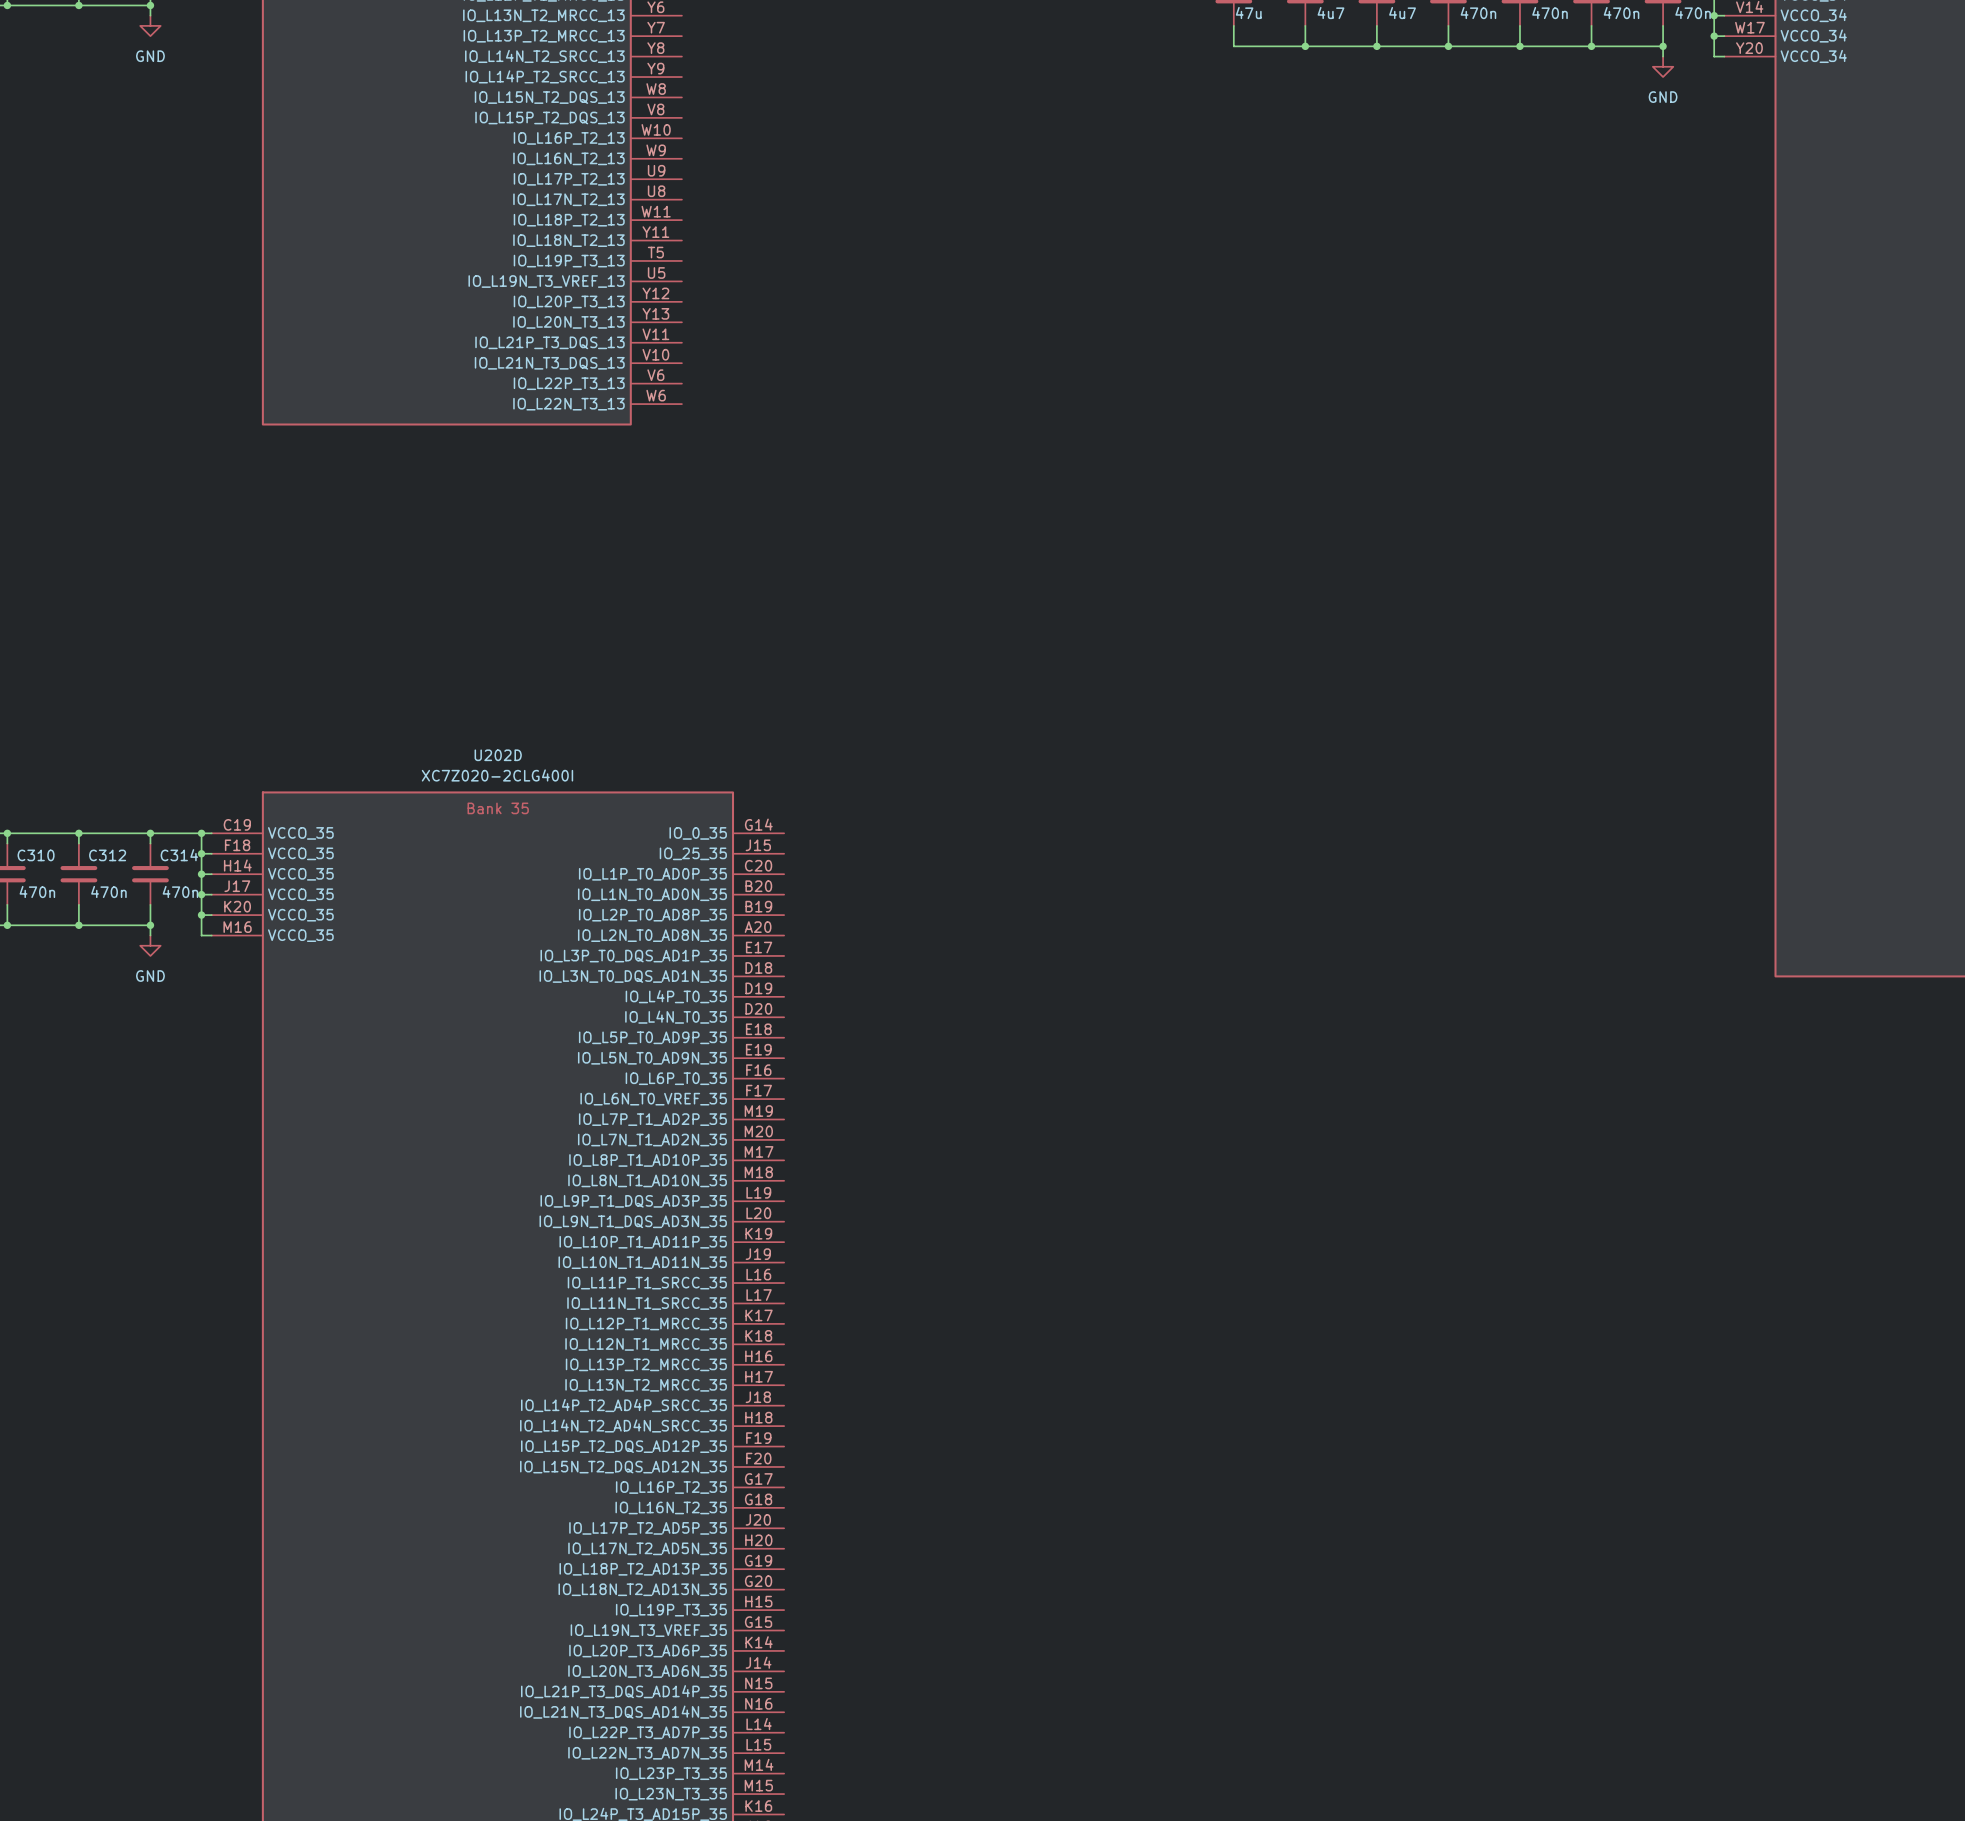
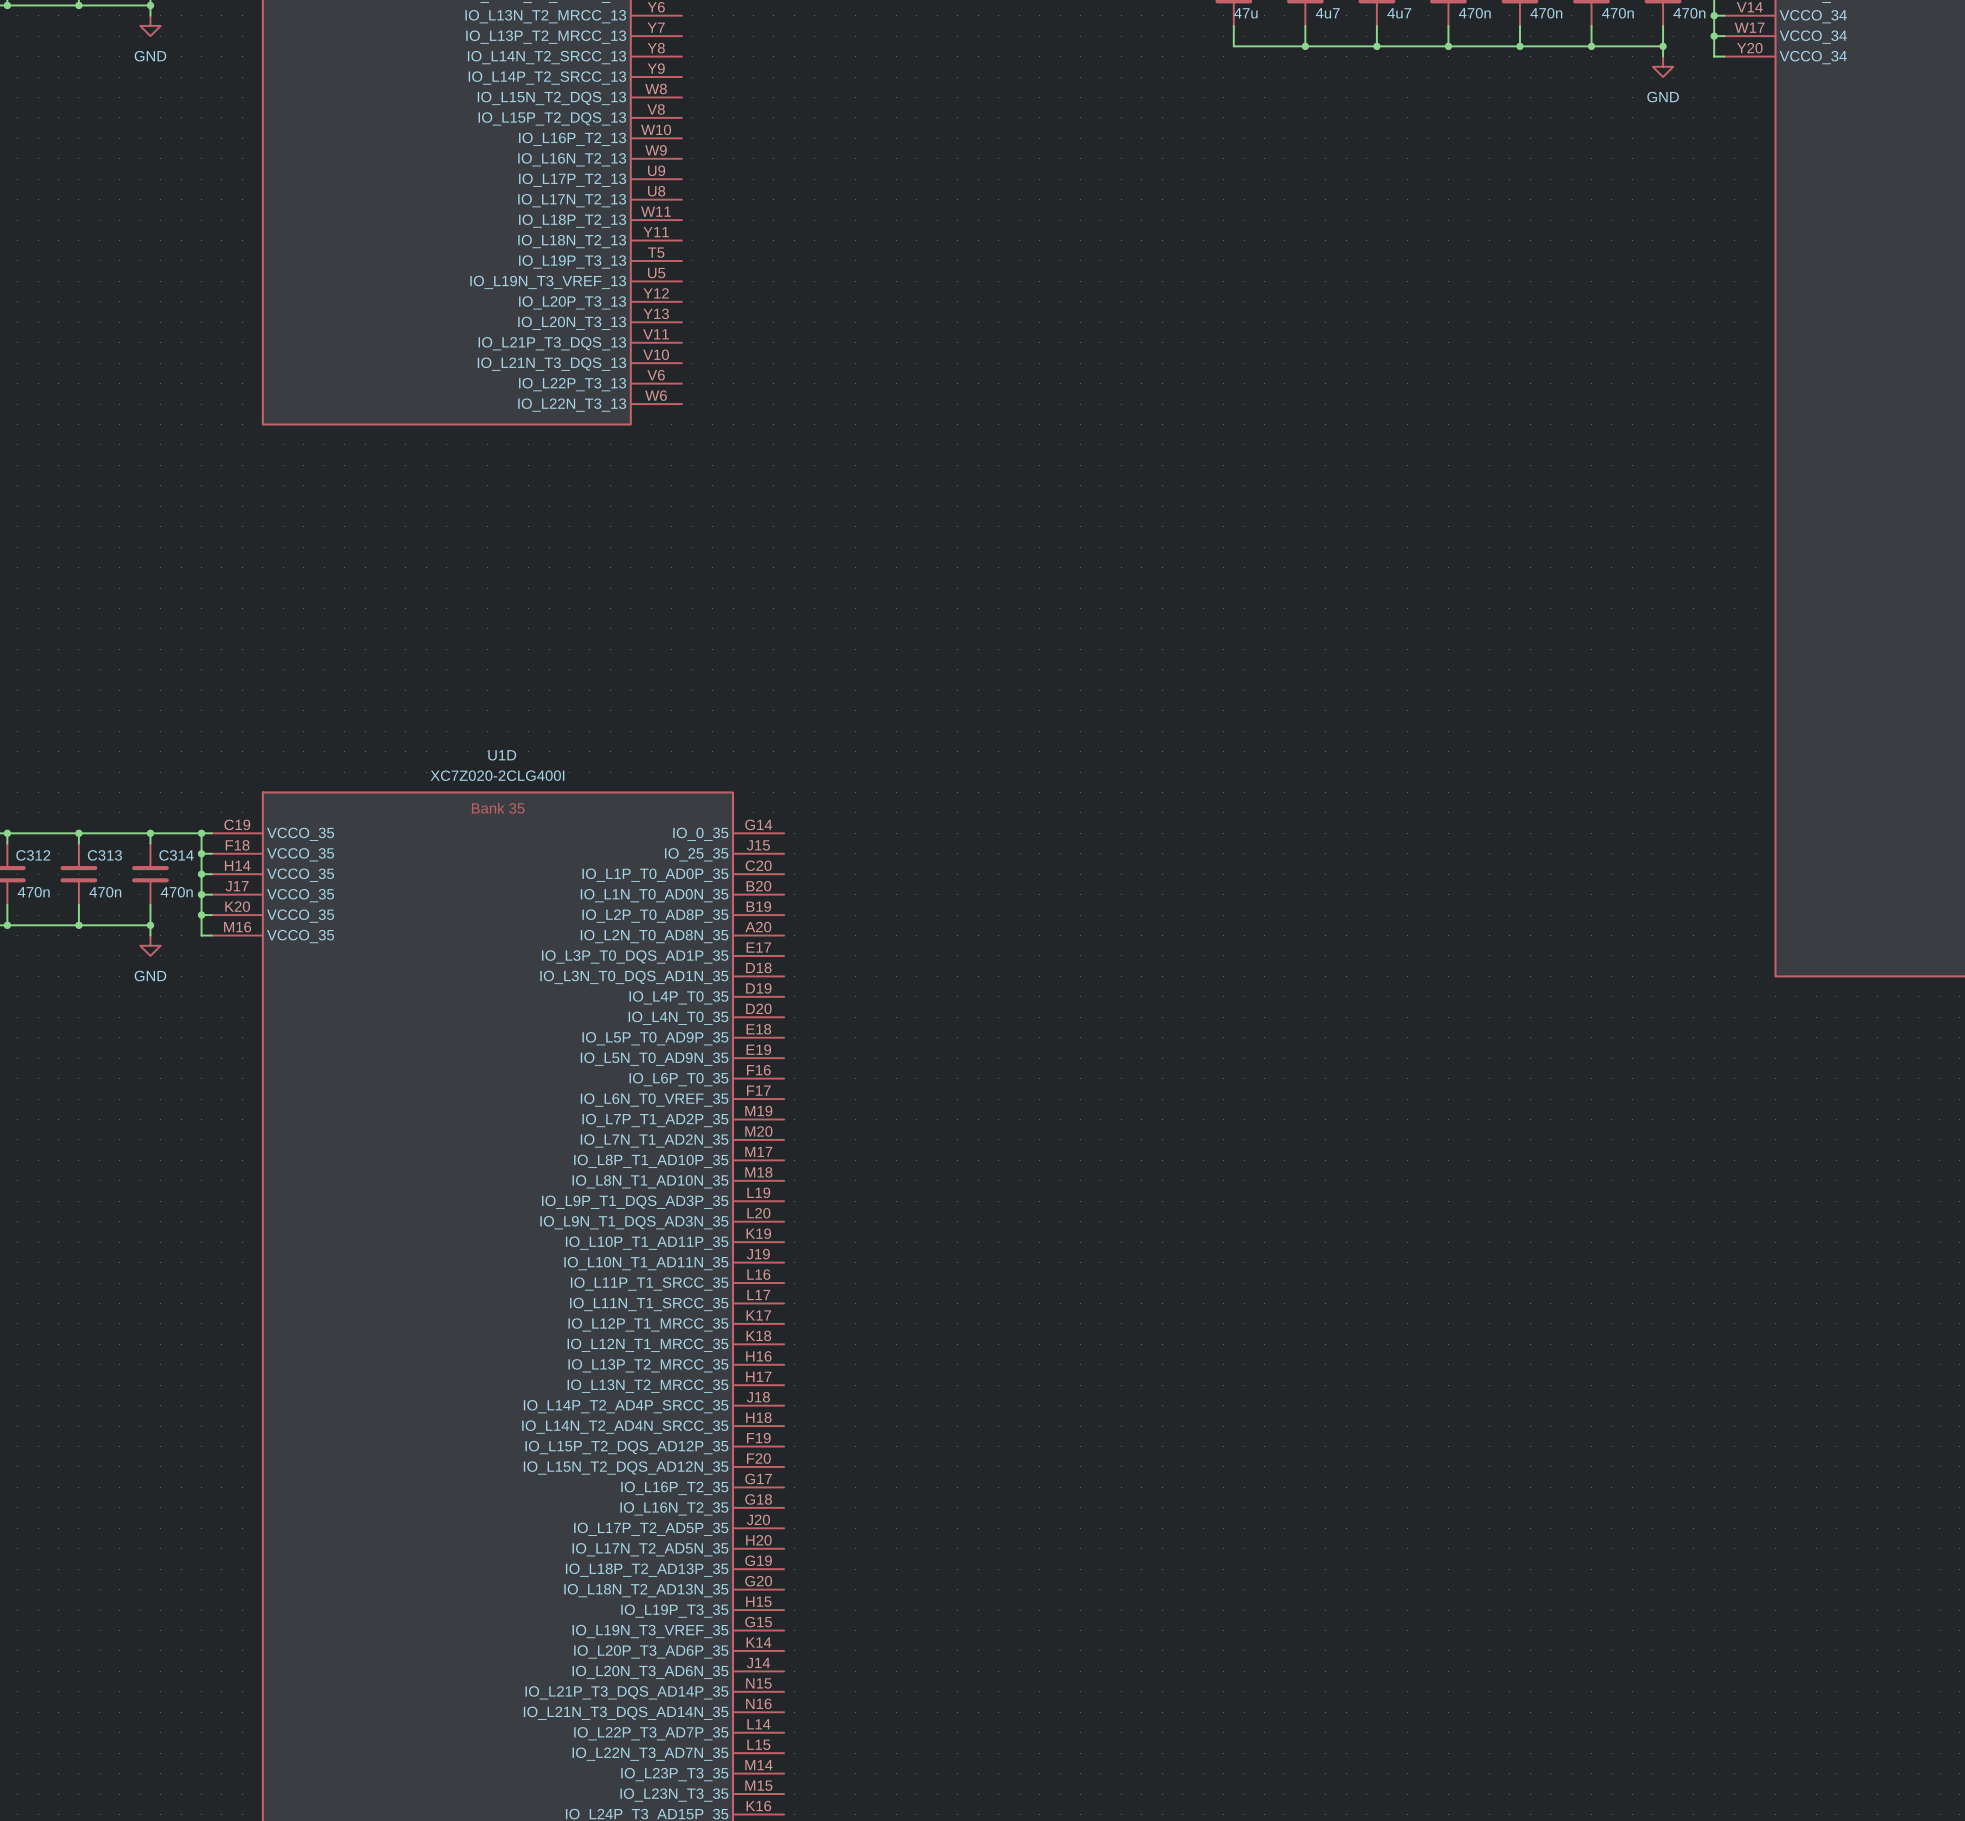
U202D name: U202D (498, 755) -> U1D (502, 755)
C310 name: C310 (36, 855) -> C312 (33, 855)
C312 name: C312 (107, 855) -> C313 (104, 855)

